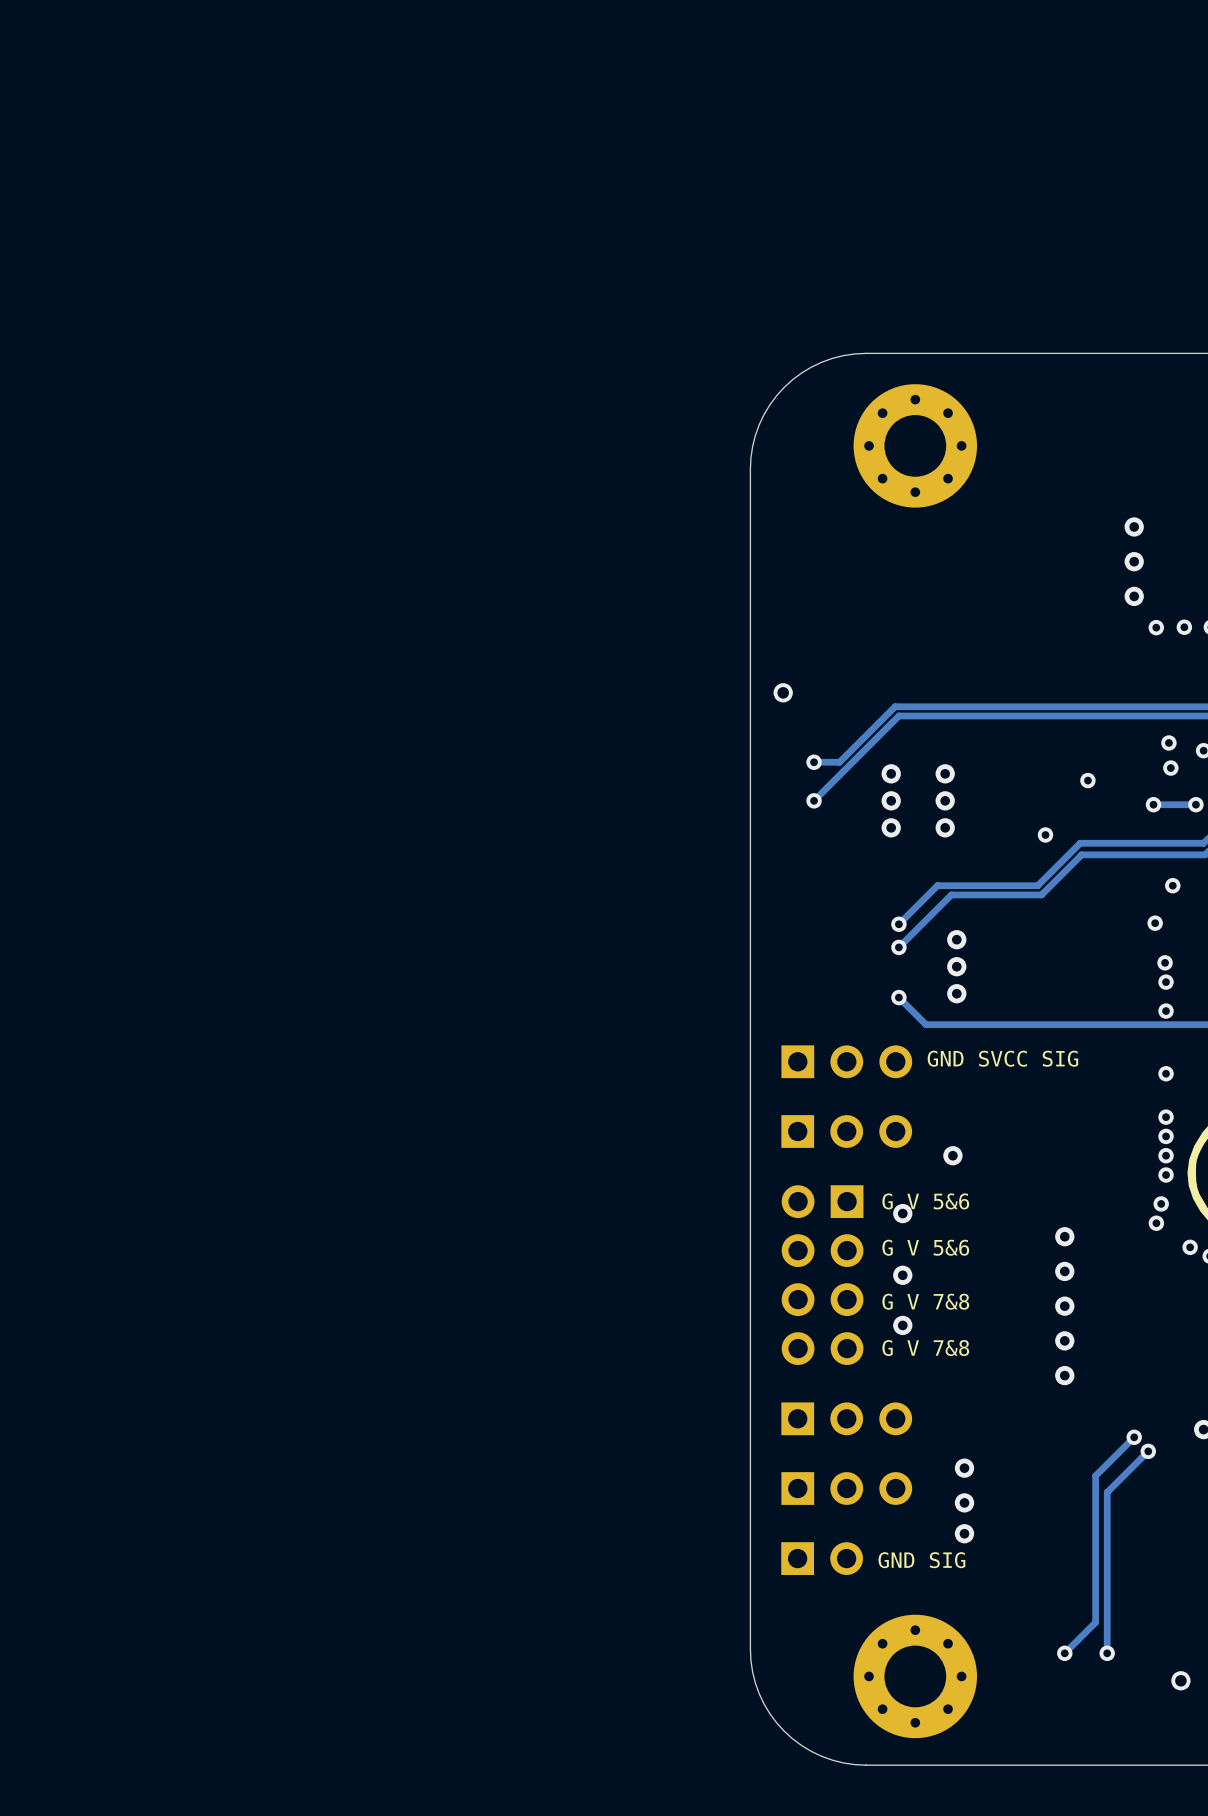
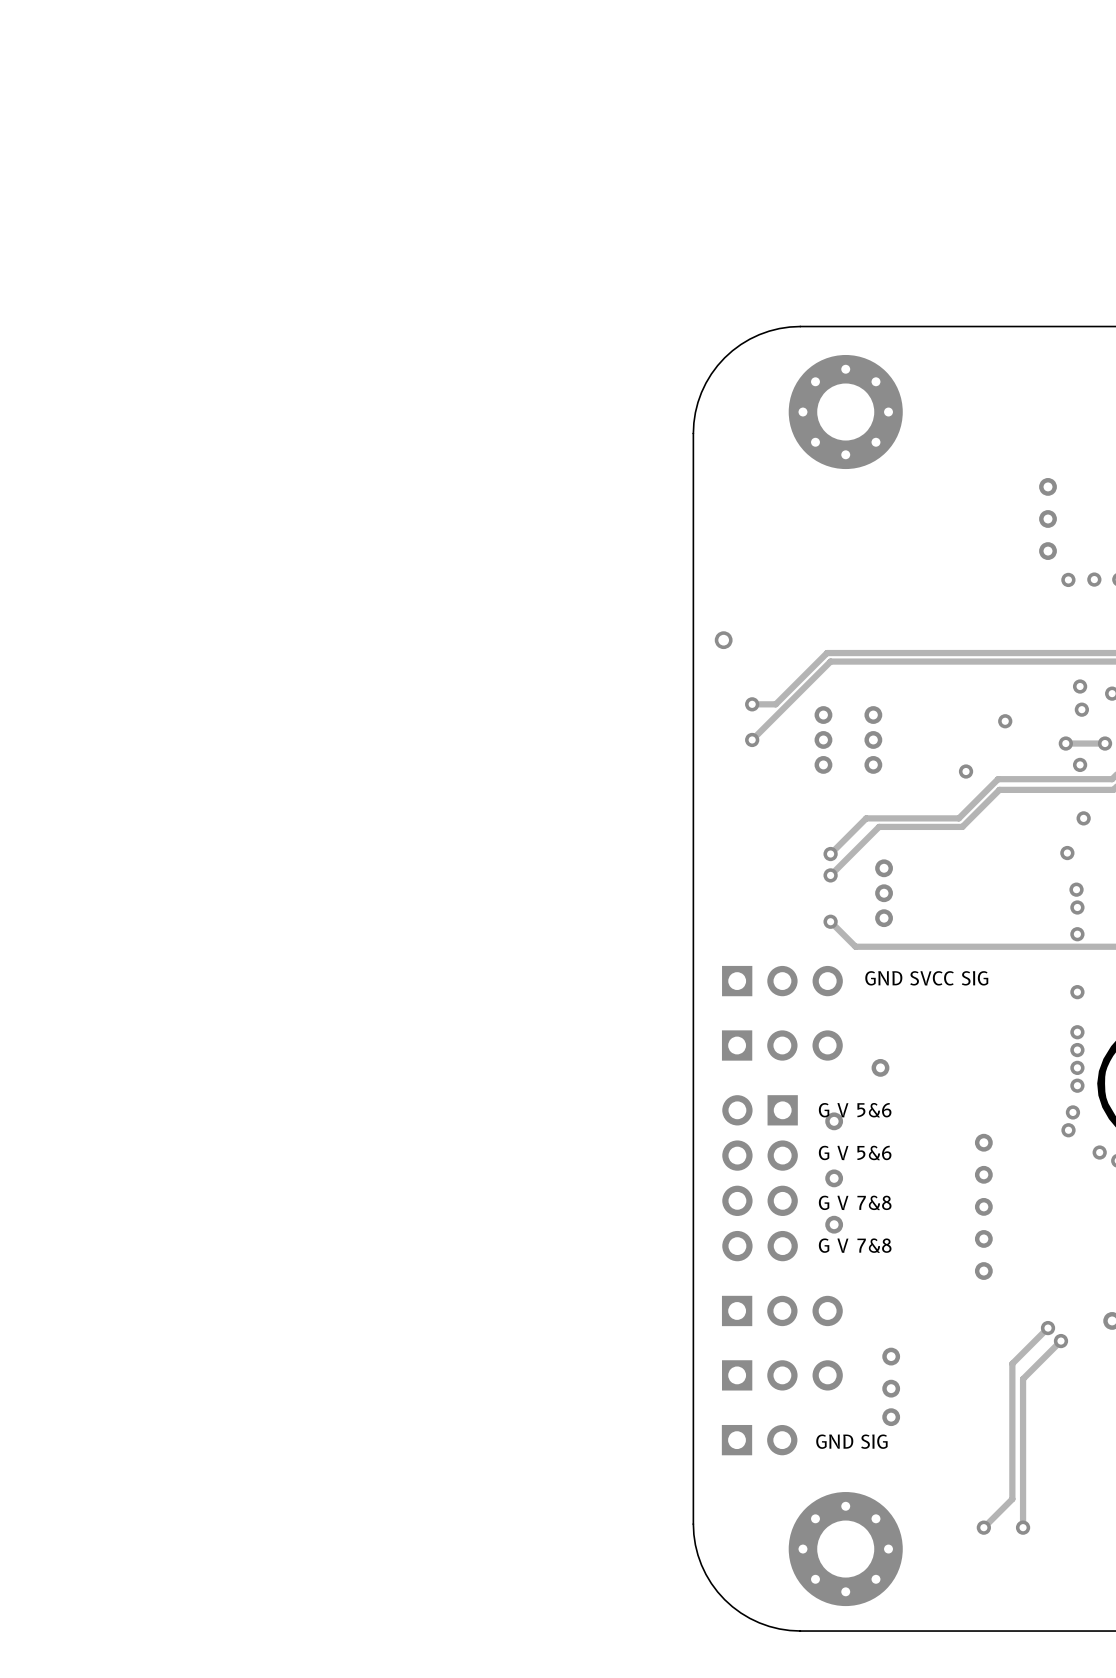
via: none -> (1080, 764)
via: (1180, 1680) -> none

